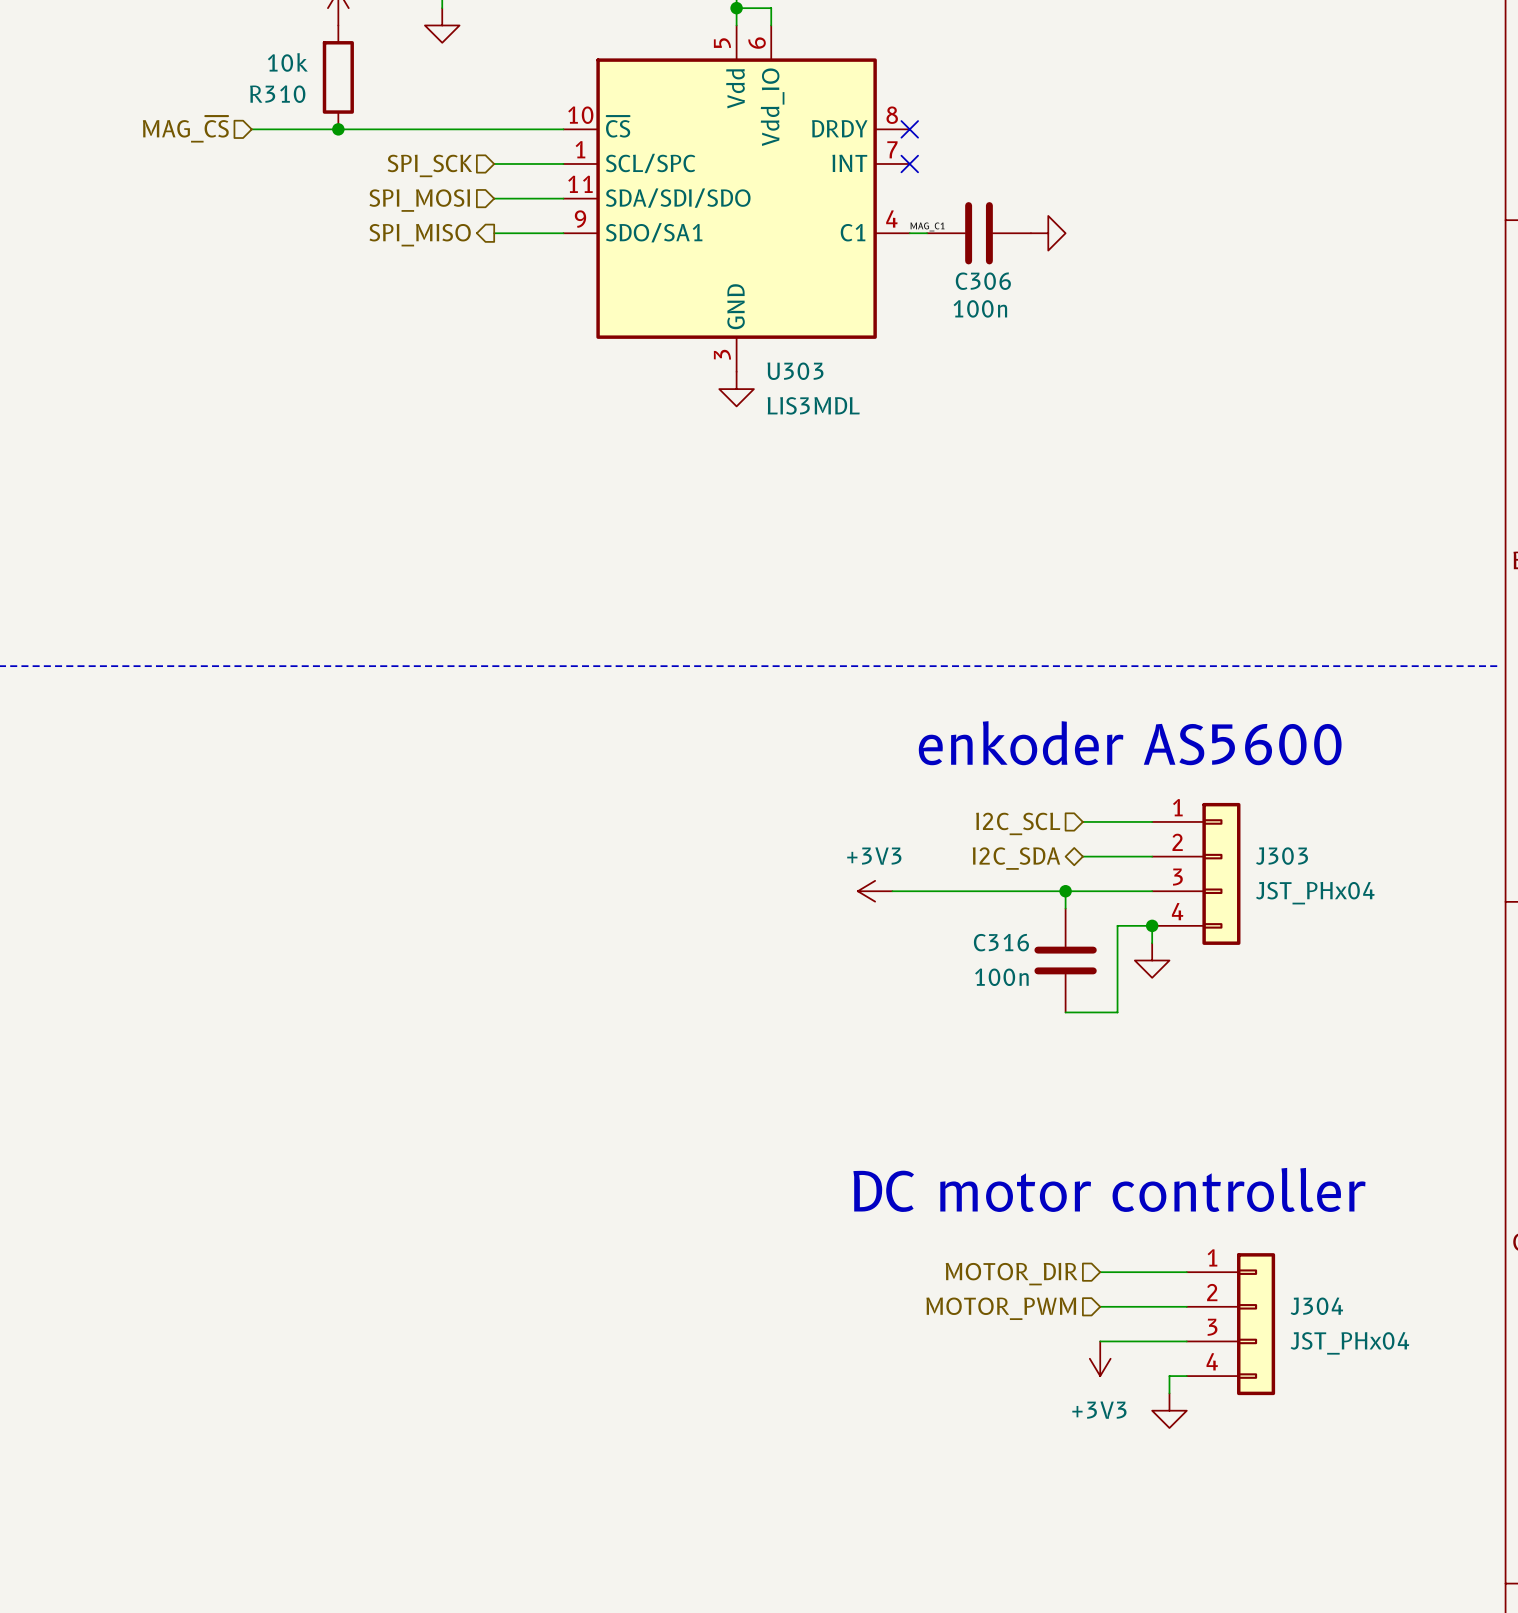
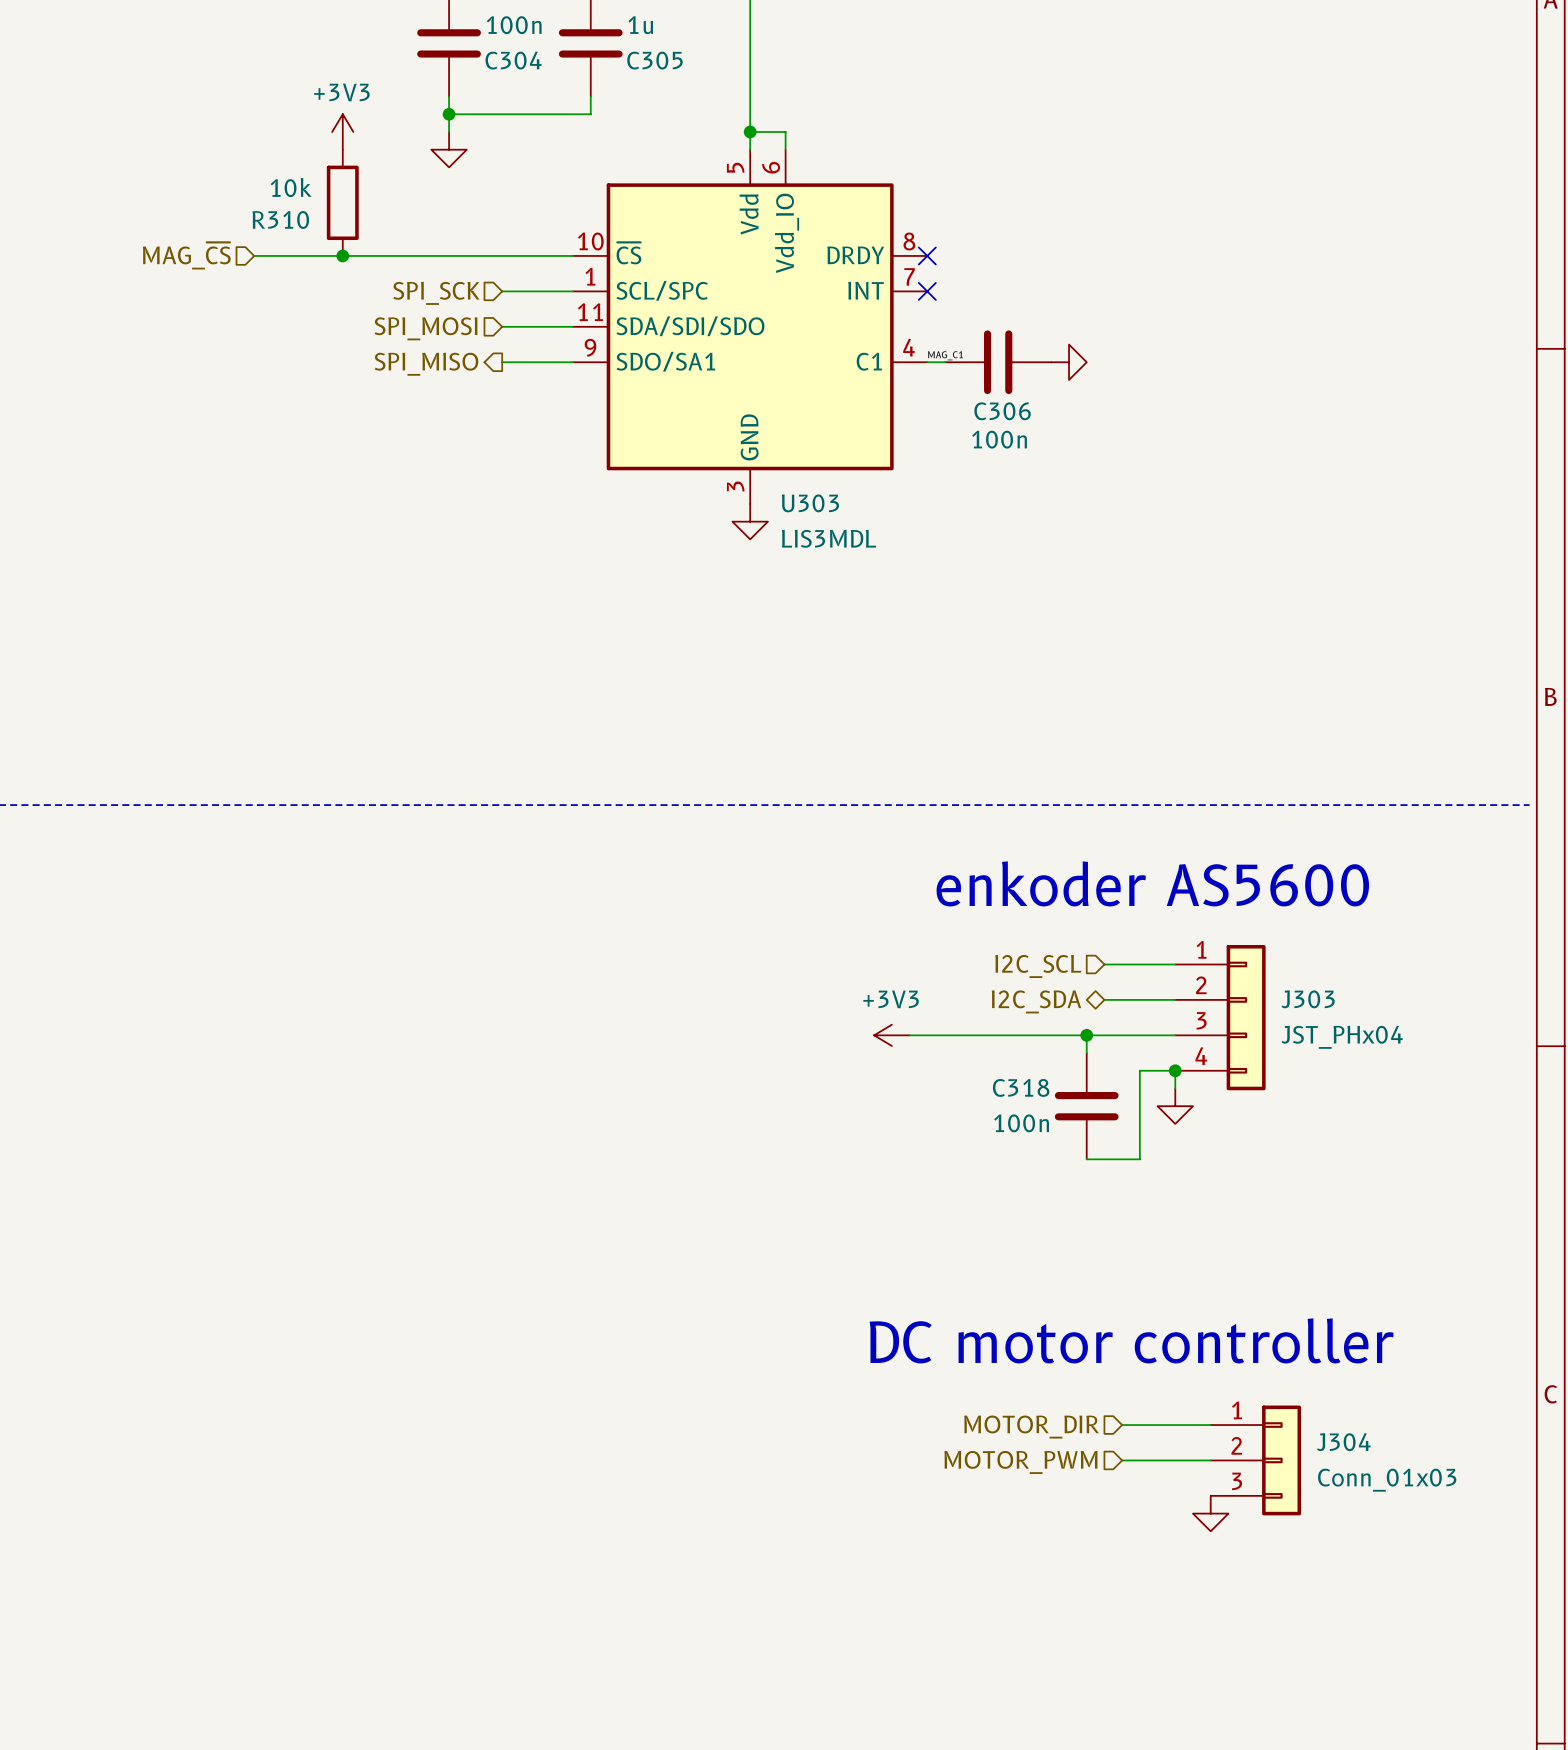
C316 name: C316 (1001, 942) -> C318 (1021, 1087)
J304 symbol: [1186, 1253, 1276, 1396] -> [1210, 1405, 1302, 1516]
wire: (1100, 1341) (1186, 1341) -> none
J304 value: JST_PHx04 (1349, 1343) -> Conn_01x03 (1387, 1480)
power symbol: +3V3 (1100, 1358) -> none
wire: (1186, 1376) (1169, 1376) (1169, 1393) -> none
power symbol position: (1169, 1410) -> (1210, 1513)

